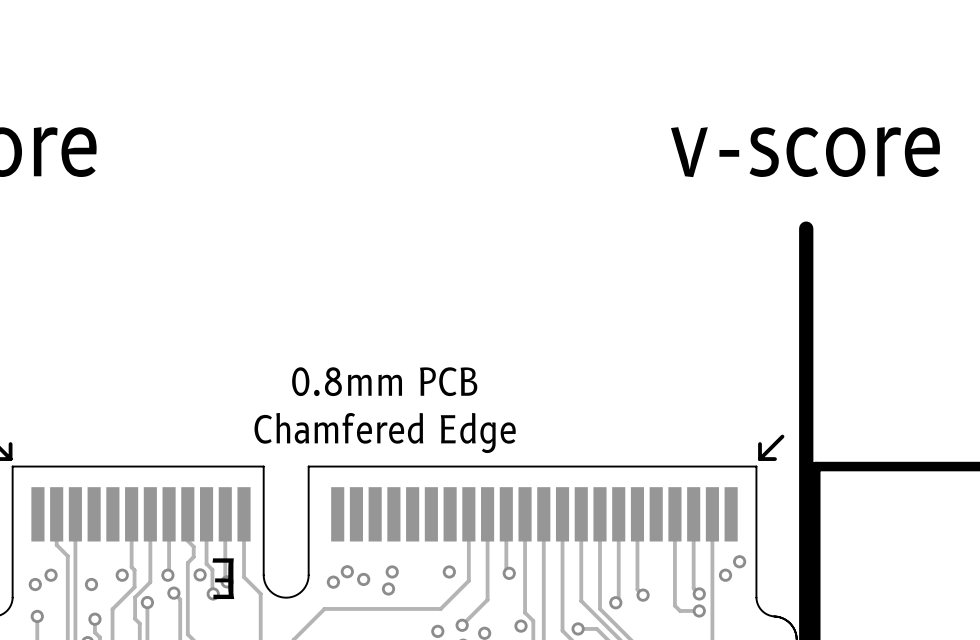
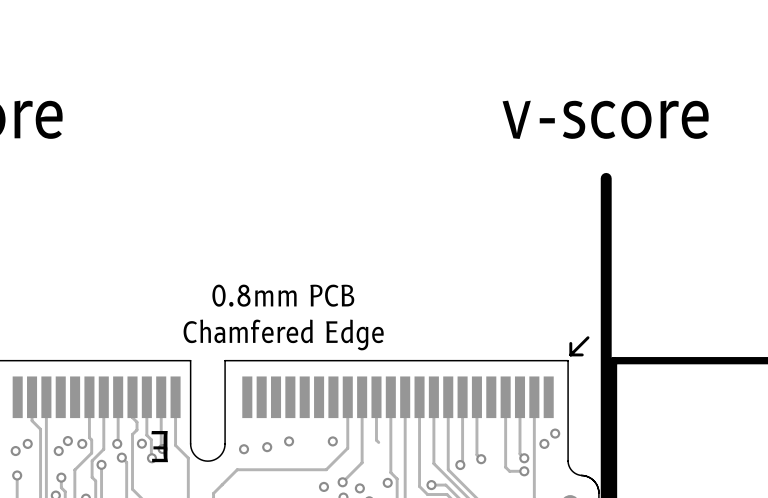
via: none -> (67, 441)
via: (347, 571) -> none
via: (509, 573) -> none
via: (388, 588) -> none

